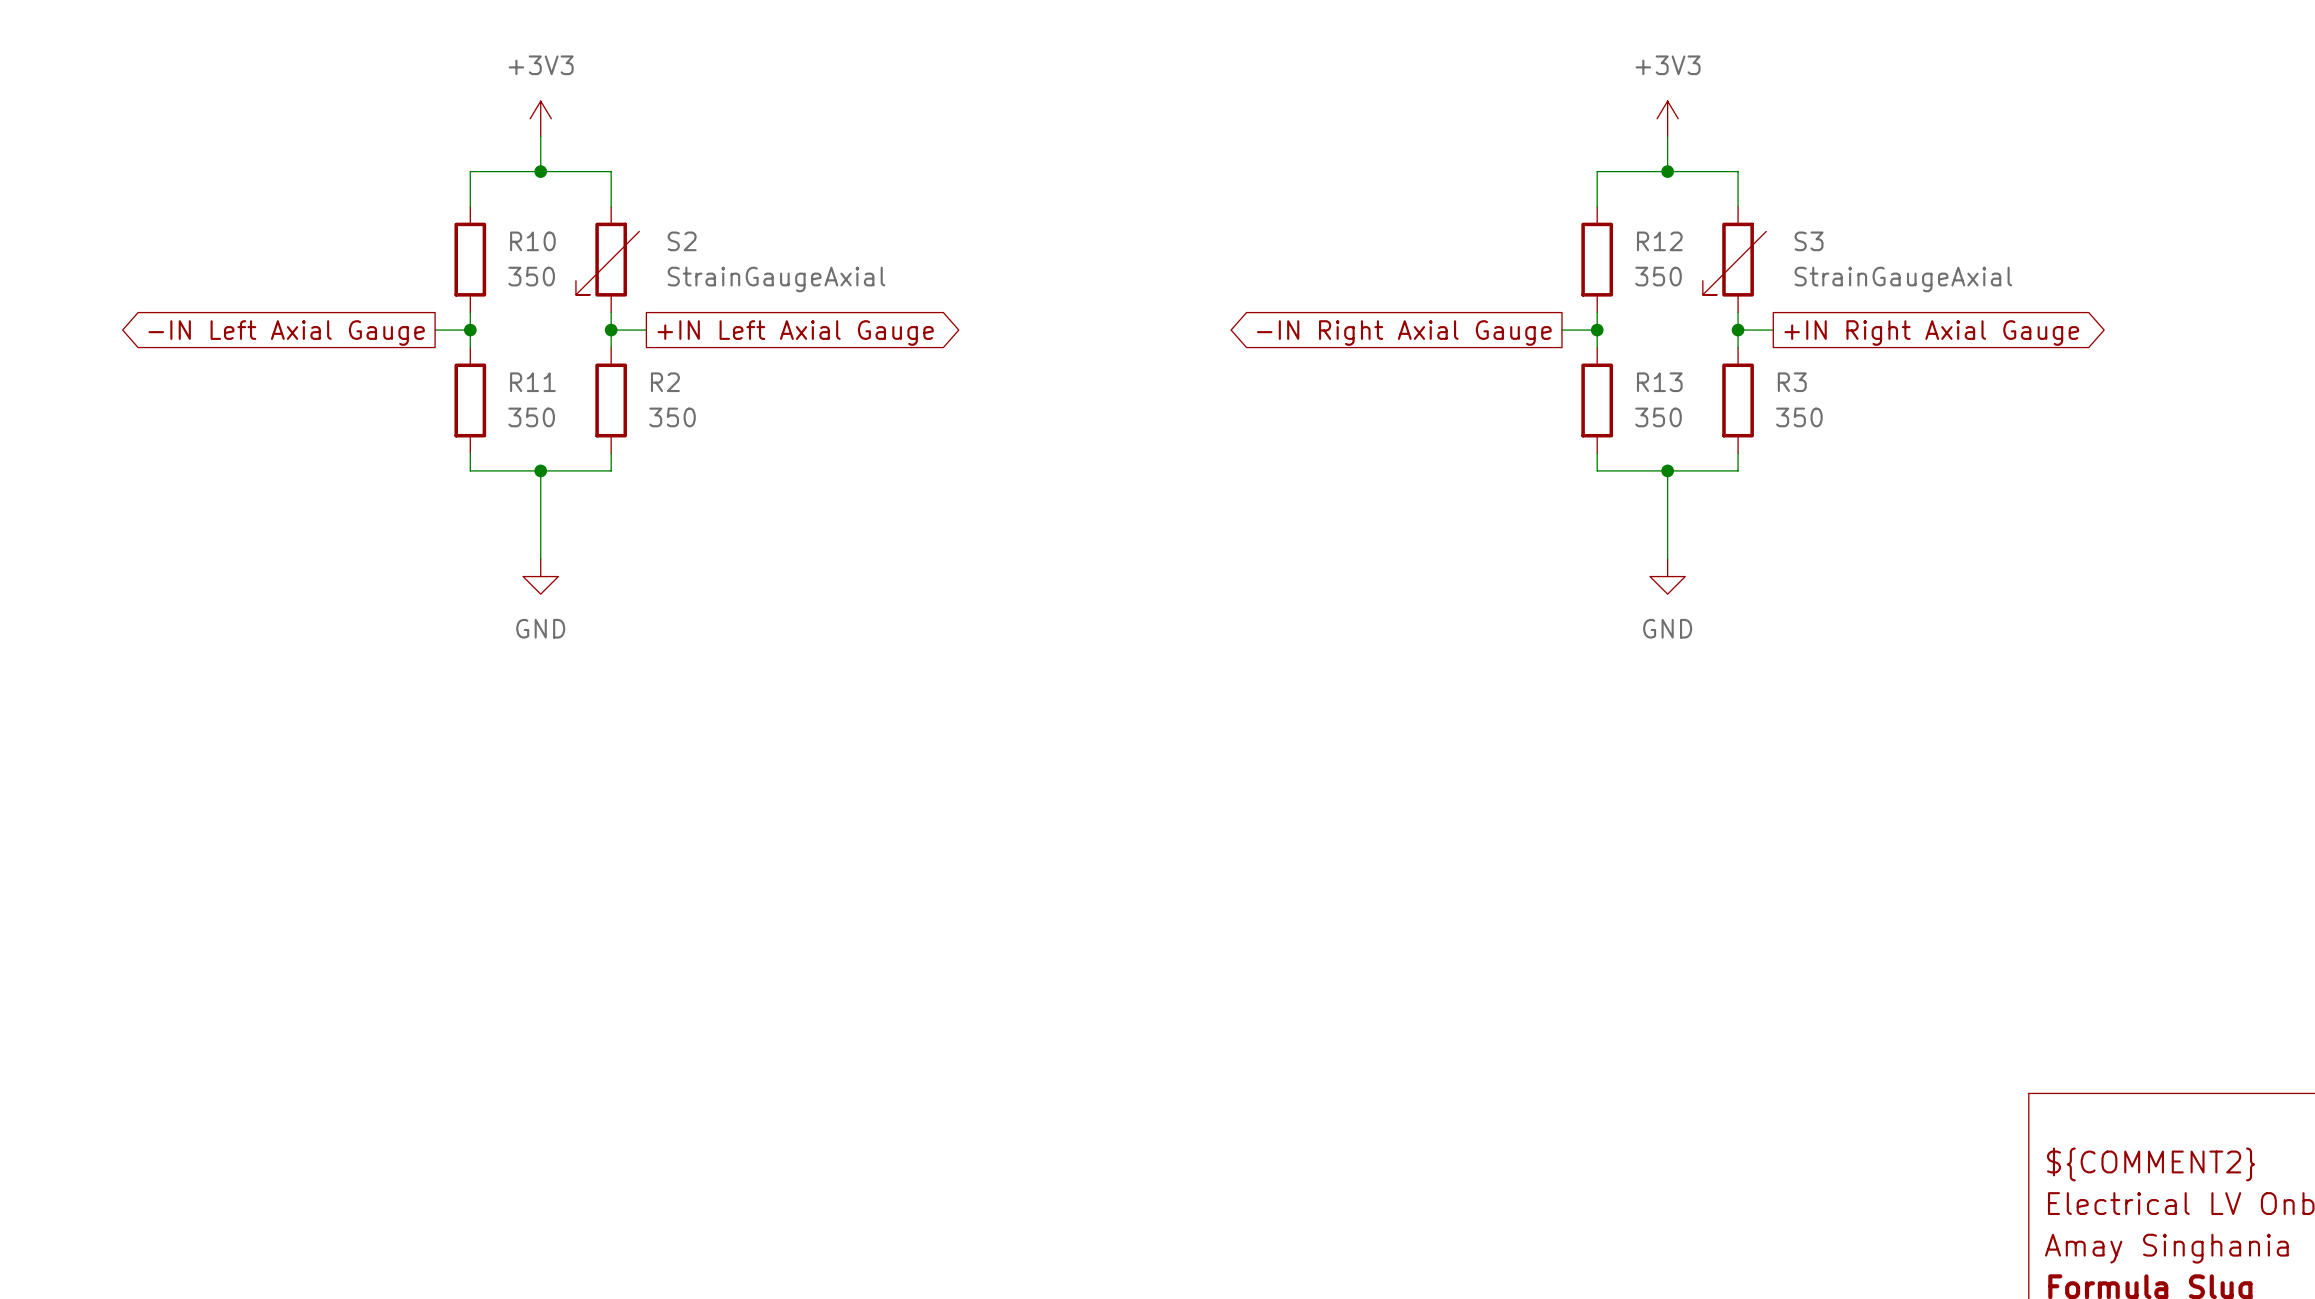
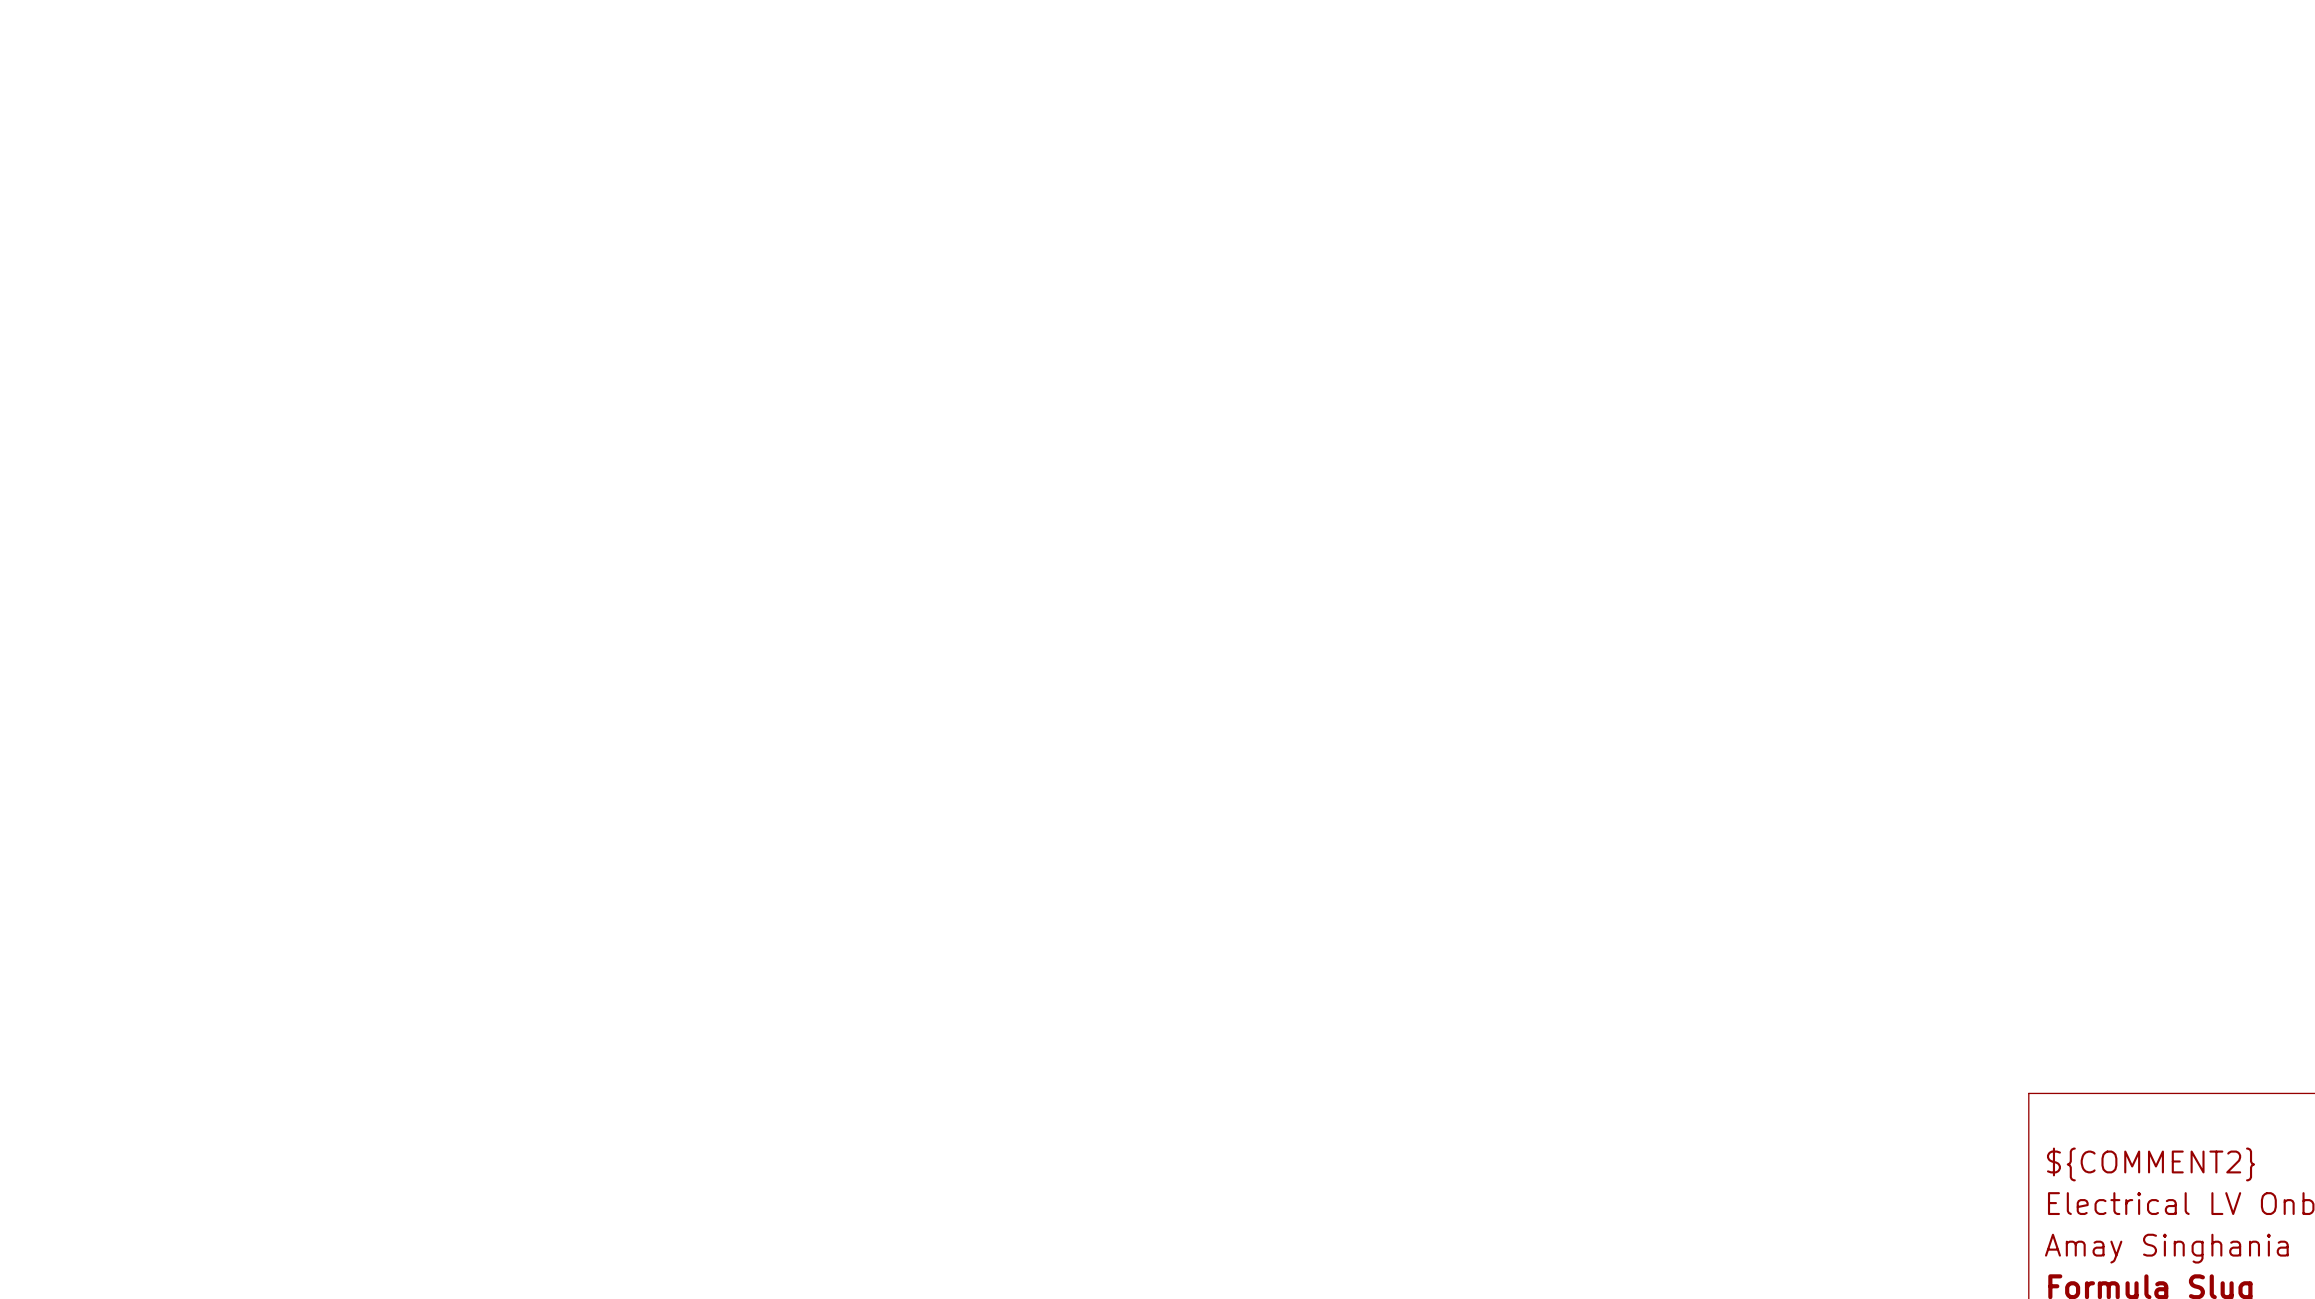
power symbol: +3V3 (540, 118) -> none
power symbol: +3V3 (1667, 118) -> none
wire: (540, 136) (540, 171) -> none
wire: (1667, 136) (1667, 171) -> none
junction: (540, 171) -> none
junction: (1667, 171) -> none
wire: (470, 206) (470, 171) (611, 171) (611, 206) -> none
wire: (1597, 206) (1597, 171) (1738, 171) (1738, 206) -> none
R10: 350 (470, 259) -> none
S2: StrainGaugeAxial (607, 259) -> none
R12: 350 (1597, 259) -> none
S3: StrainGaugeAxial (1734, 259) -> none
wire: (470, 312) (470, 347) -> none
wire: (611, 312) (611, 347) -> none
wire: (1597, 312) (1597, 347) -> none
wire: (1738, 312) (1738, 347) -> none
wire: (435, 330) (470, 330) -> none
junction: (470, 330) -> none
wire: (611, 330) (646, 330) -> none
junction: (611, 330) -> none
wire: (1561, 330) (1597, 330) -> none
junction: (1597, 330) -> none
wire: (1738, 330) (1773, 330) -> none
junction: (1738, 330) -> none
global label: -IN Left Axial Gauge (286, 332) -> none
global label: +IN Left Axial Gauge (795, 332) -> none
global label: -IN Right Axial Gauge (1404, 332) -> none
global label: +IN Right Axial Gauge (1931, 332) -> none
R11: 350 (470, 400) -> none
R2: 350 (611, 400) -> none
R13: 350 (1597, 400) -> none
R3: 350 (1738, 400) -> none
wire: (470, 453) (470, 470) (611, 470) (611, 453) -> none
wire: (1597, 453) (1597, 470) (1738, 470) (1738, 453) -> none
wire: (540, 470) (540, 558) -> none
junction: (540, 470) -> none
wire: (1667, 470) (1667, 558) -> none
junction: (1667, 470) -> none
power symbol: GND (540, 576) -> none
power symbol: GND (1667, 576) -> none

